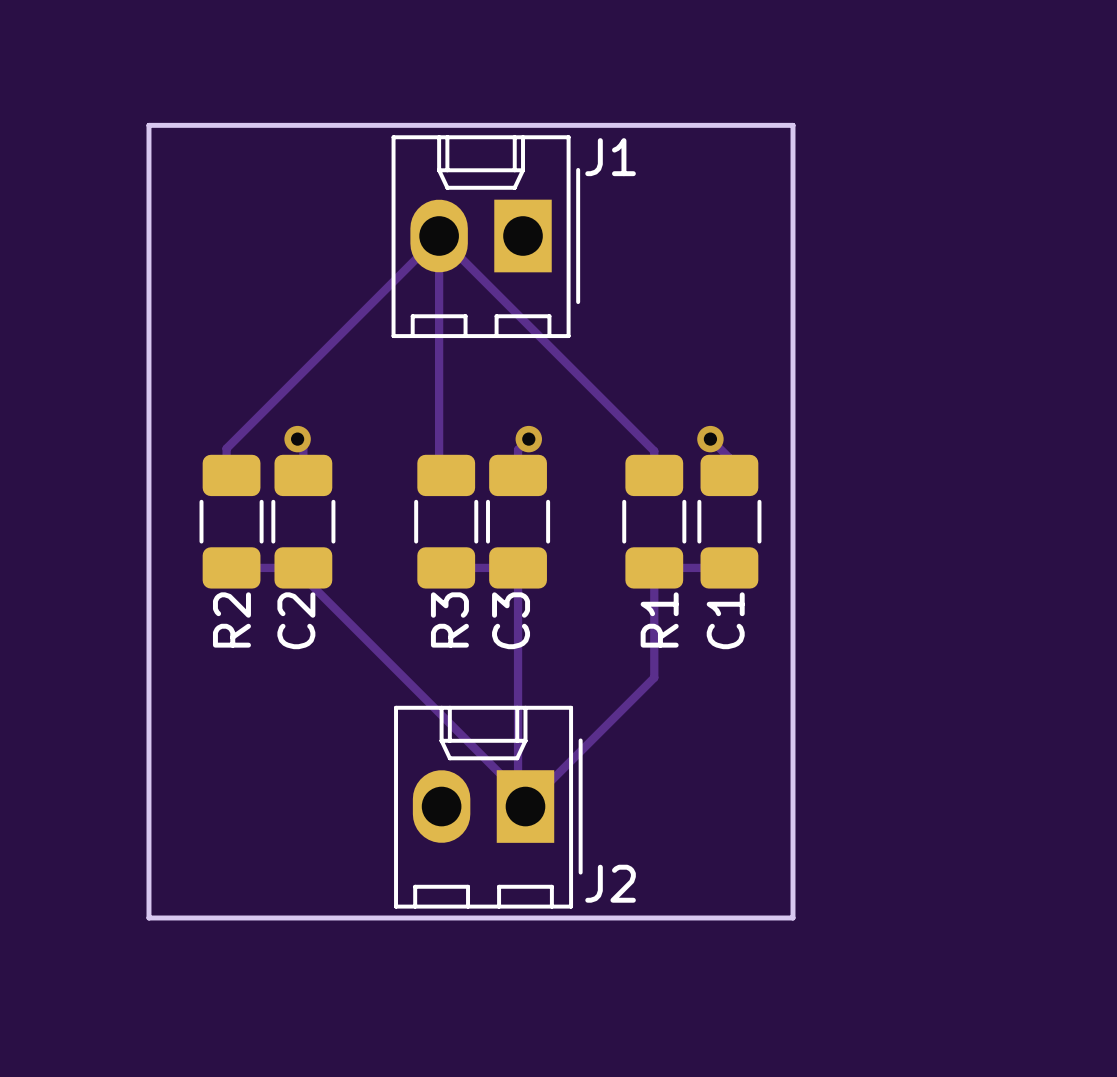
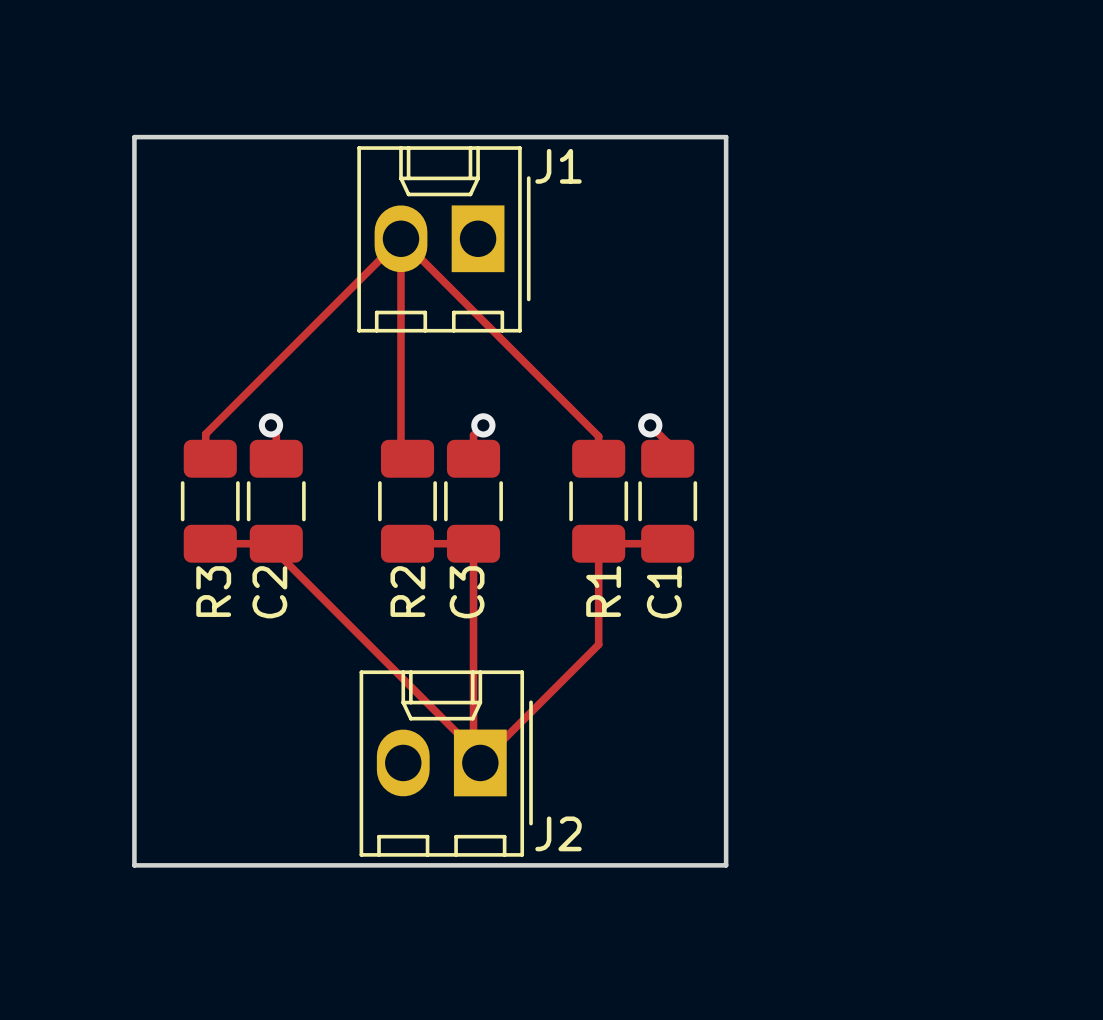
R2 name: R2 (231, 619) -> R3 (213, 591)
R3 name: R3 (449, 619) -> R2 (407, 591)

